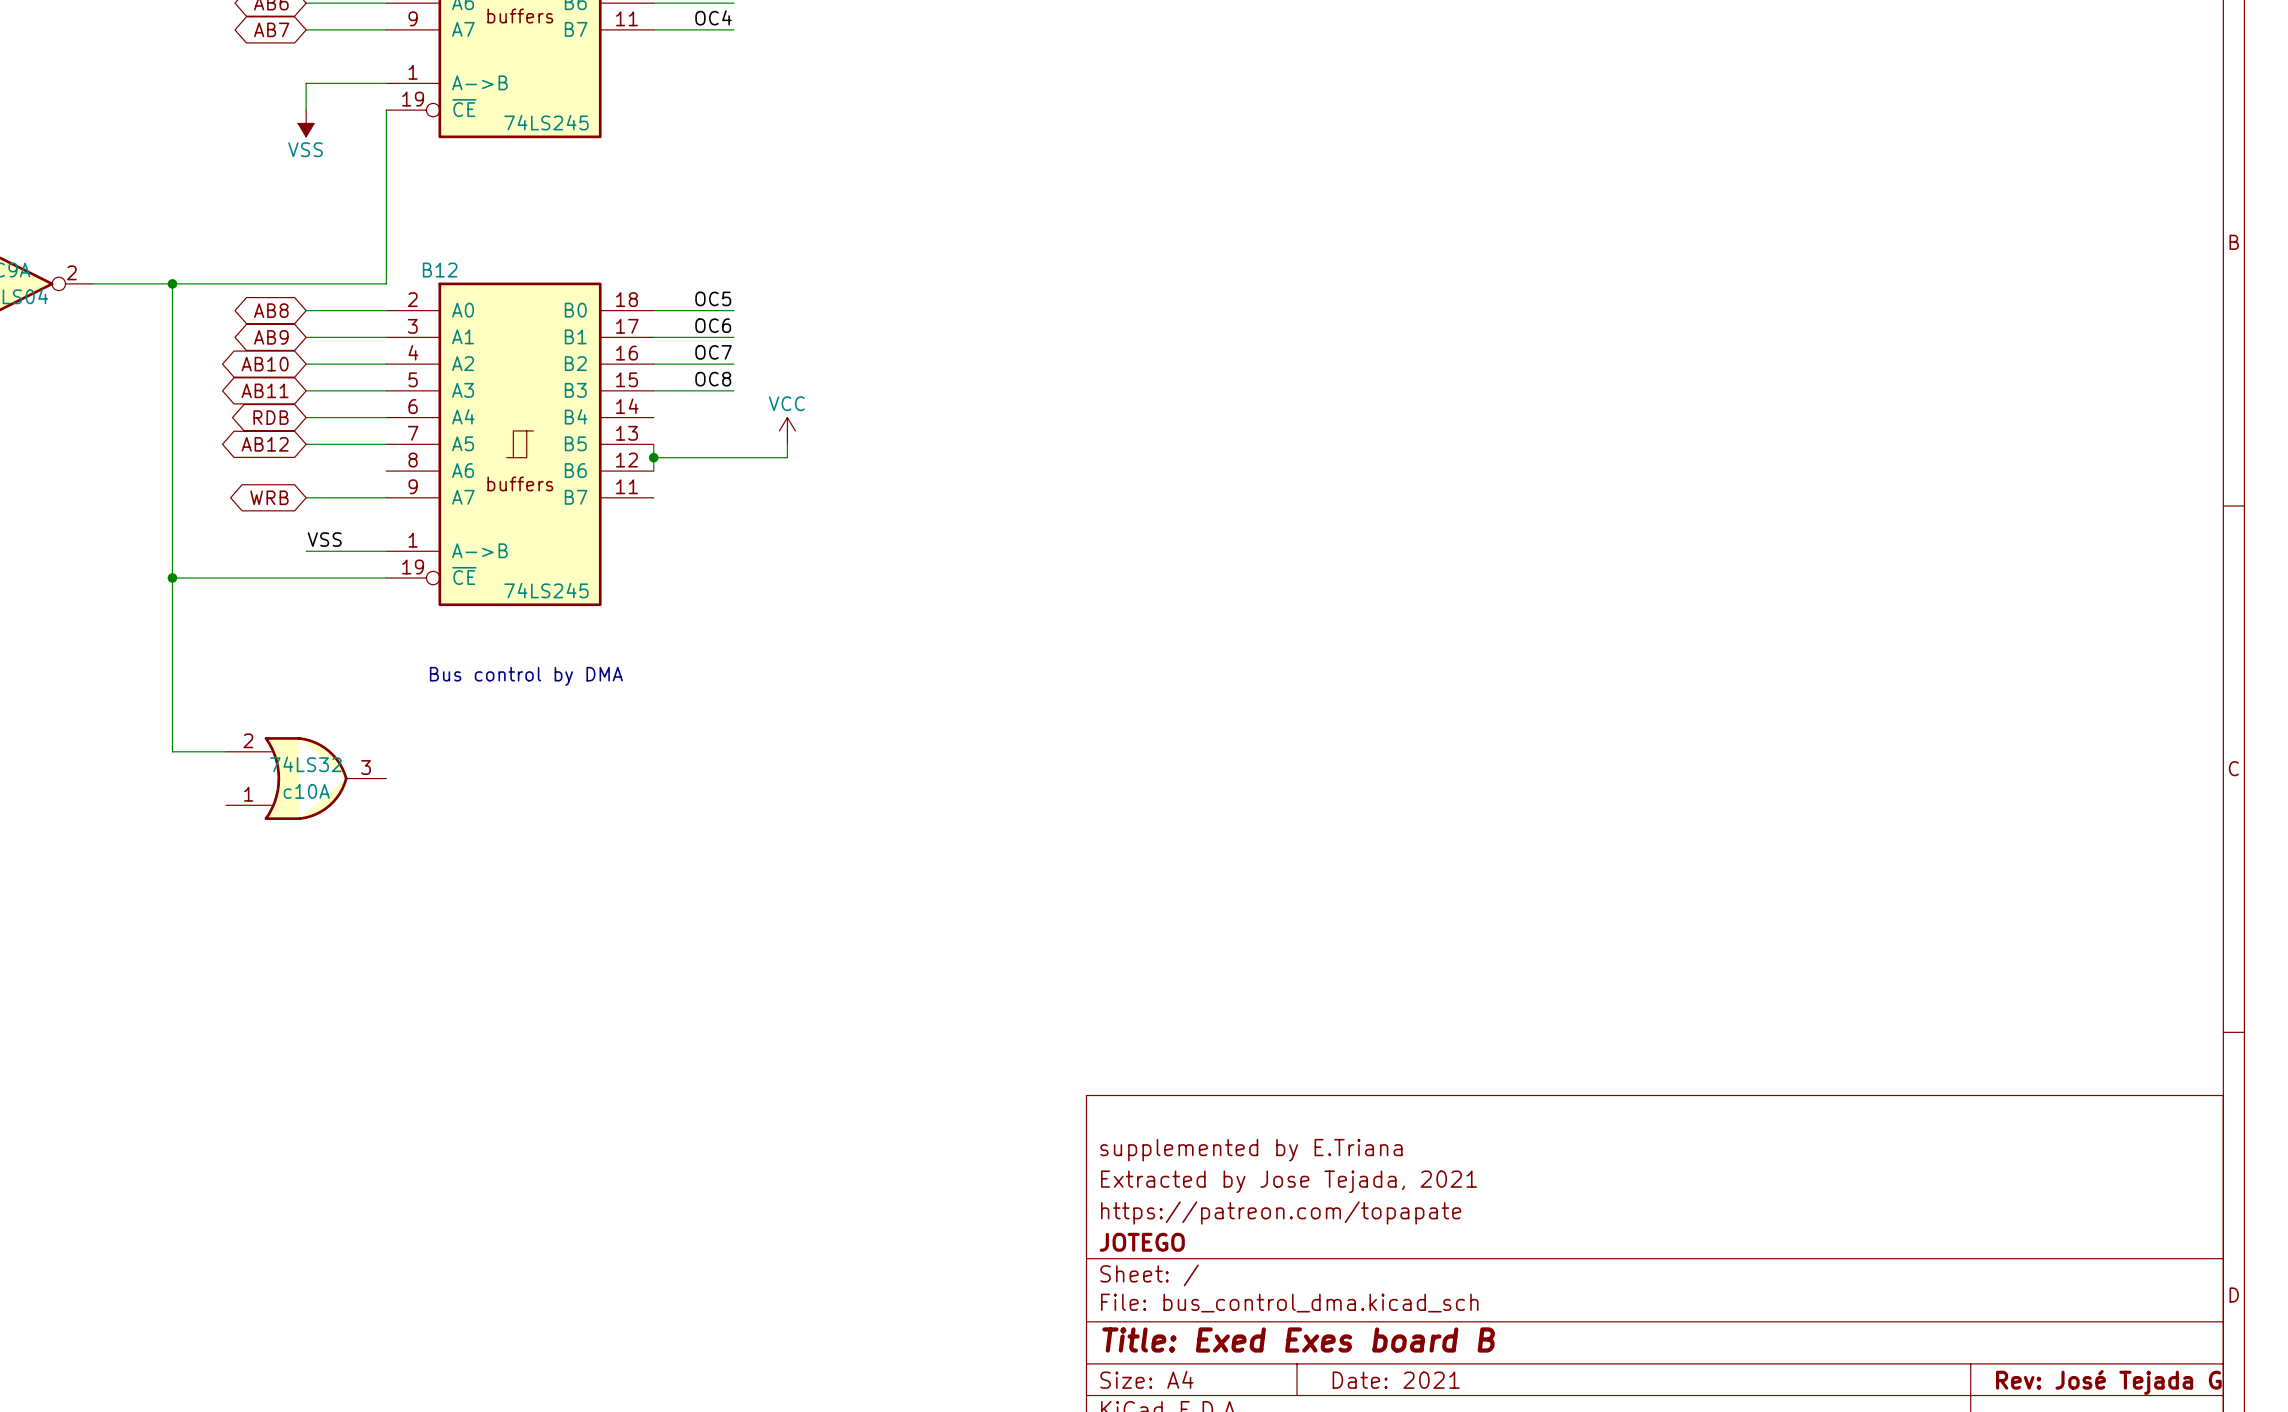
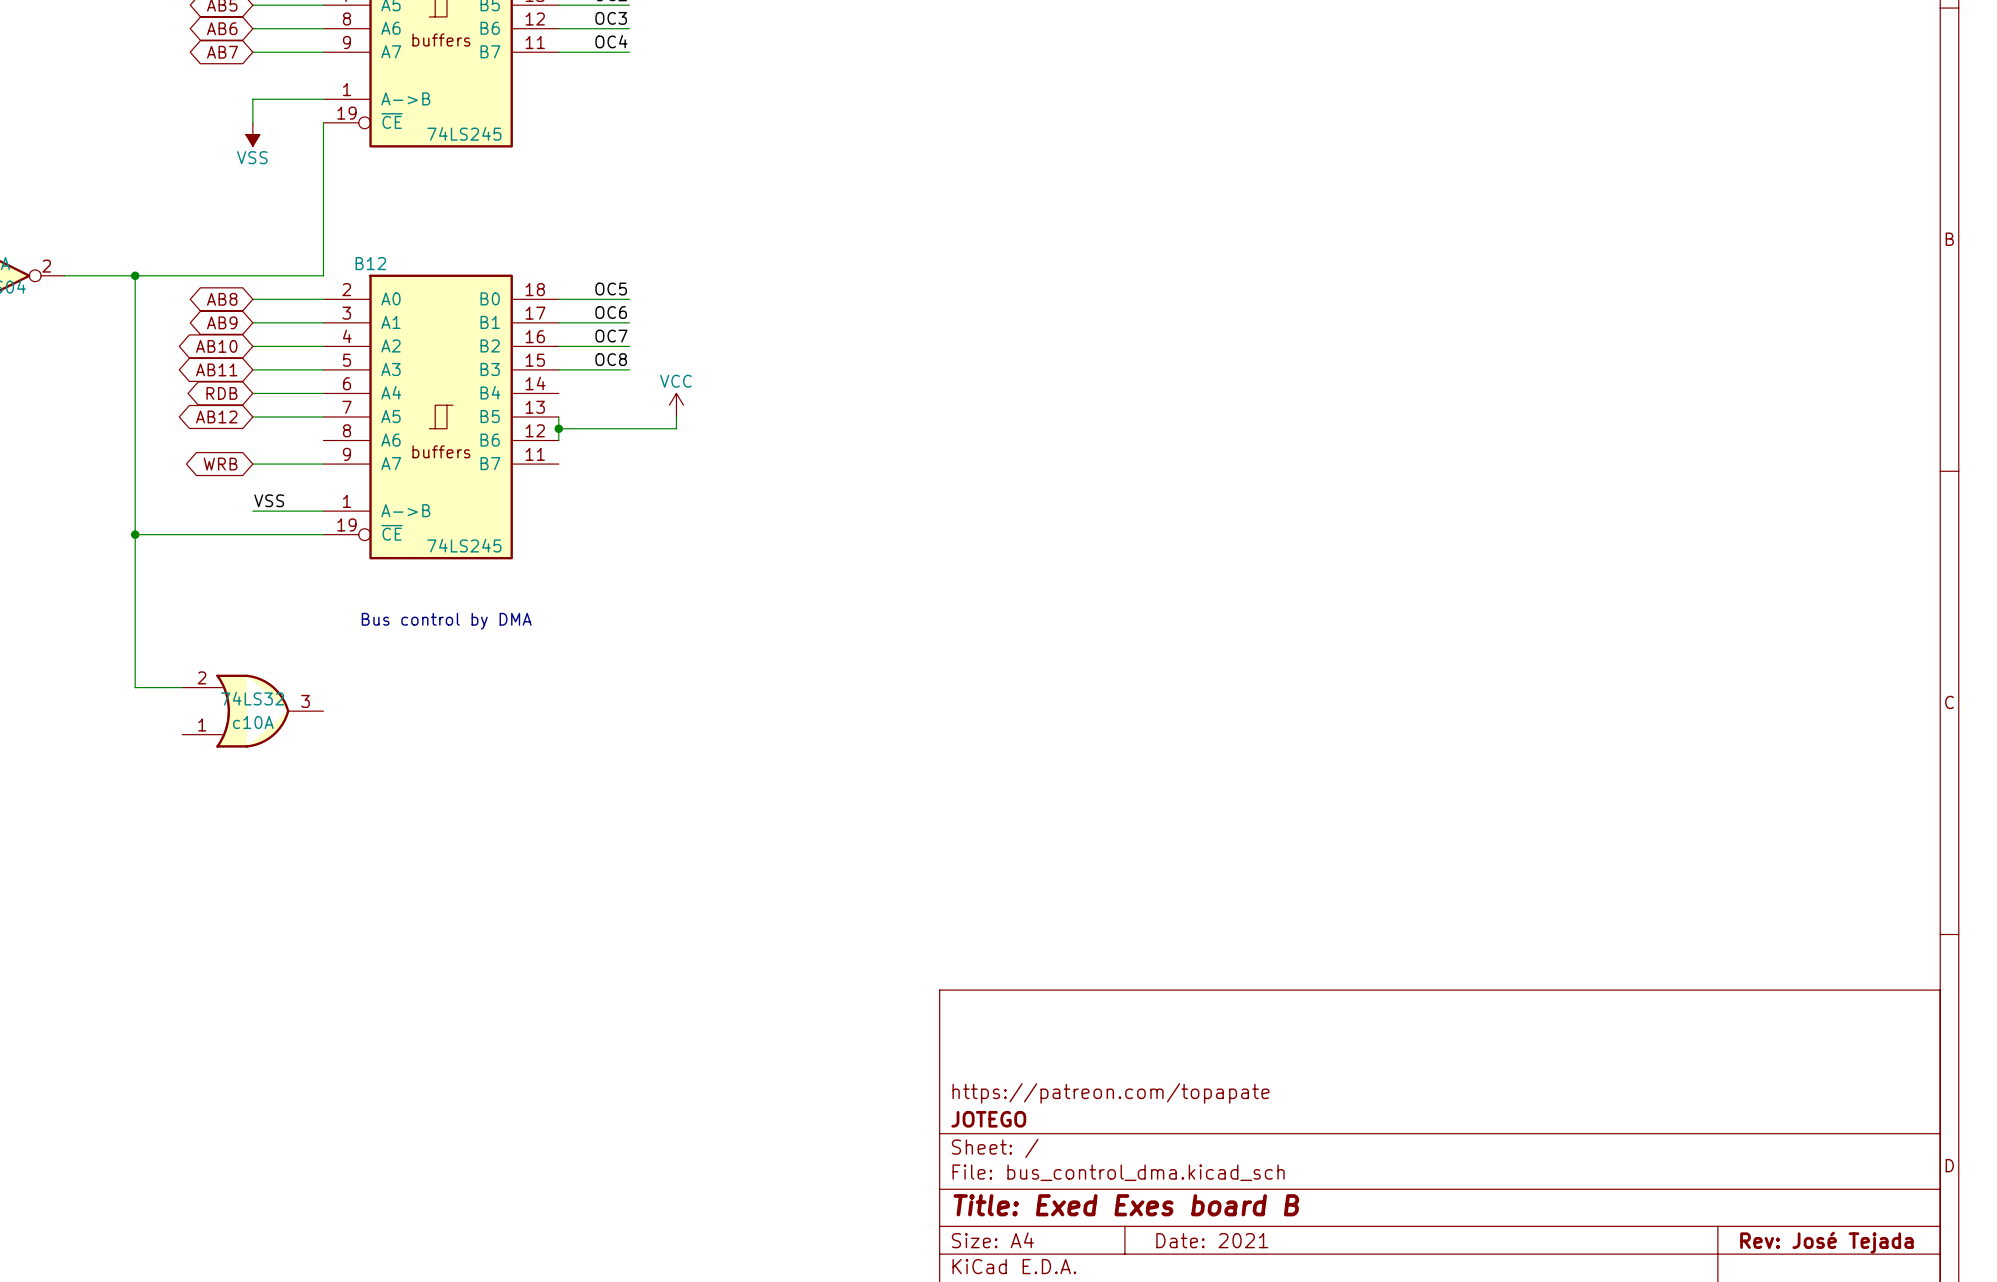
title block: supplemented by E.Triana (1251, 1150) -> none
title block: Extracted by Jose Tejada, 2021 (1289, 1181) -> none
title block: Rev: José Tejada G (2108, 1382) -> Rev: José Tejada (1826, 1242)

